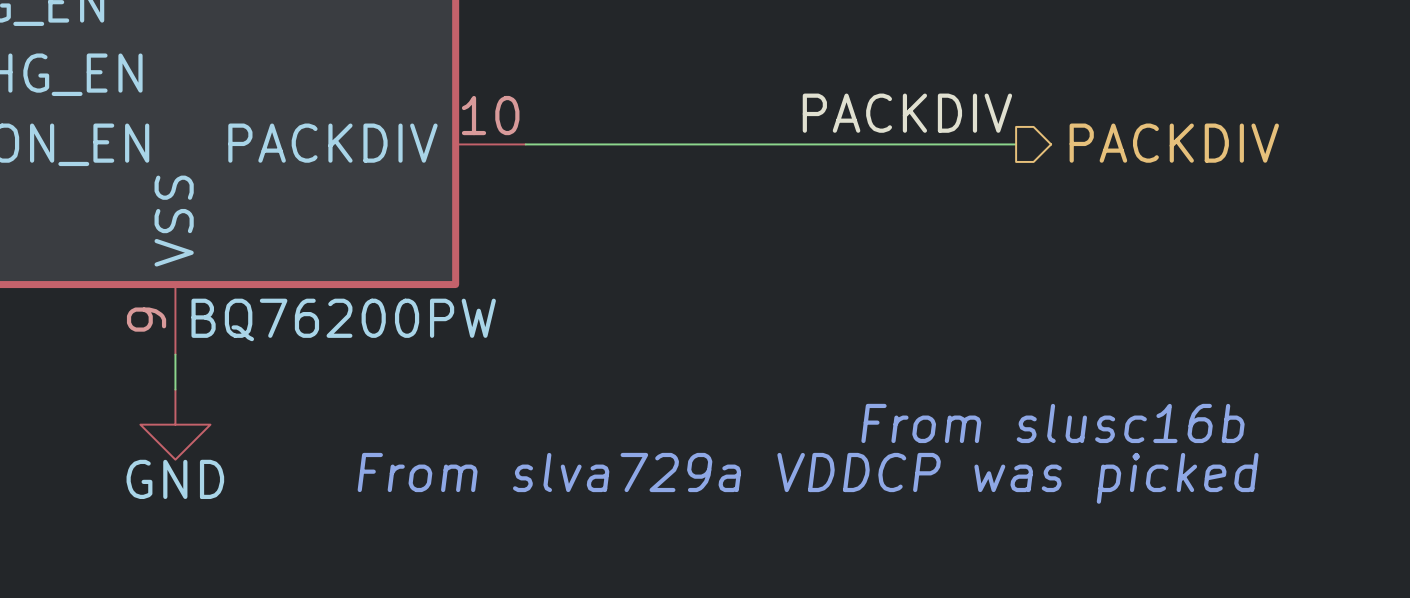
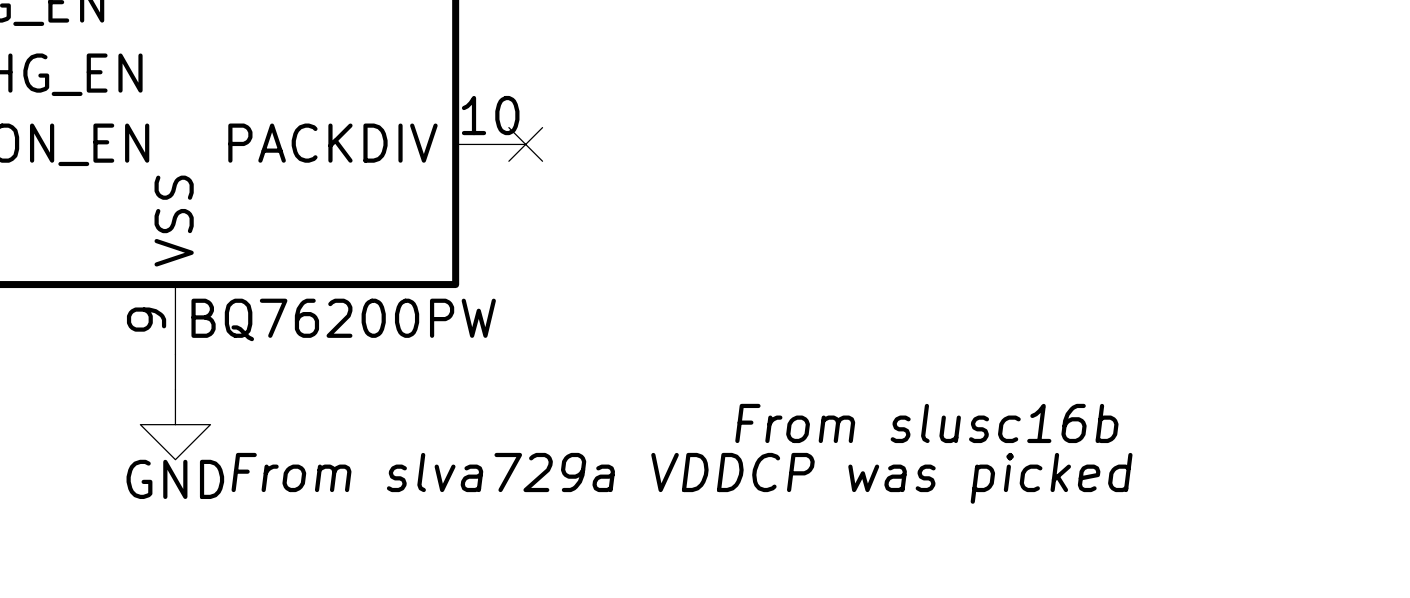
label: PACKDIV (907, 113) -> none
hierarchical label: PACKDIV (1174, 143) -> none
wire: (525, 144) (1016, 144) -> none
no-connect mark: none -> (525, 144)
text position: From slusc16b (1053, 423) -> From slusc16b (926, 423)
text position: From slva729a VDDCP was picked (808, 478) -> From slva729a VDDCP was picked (682, 478)

